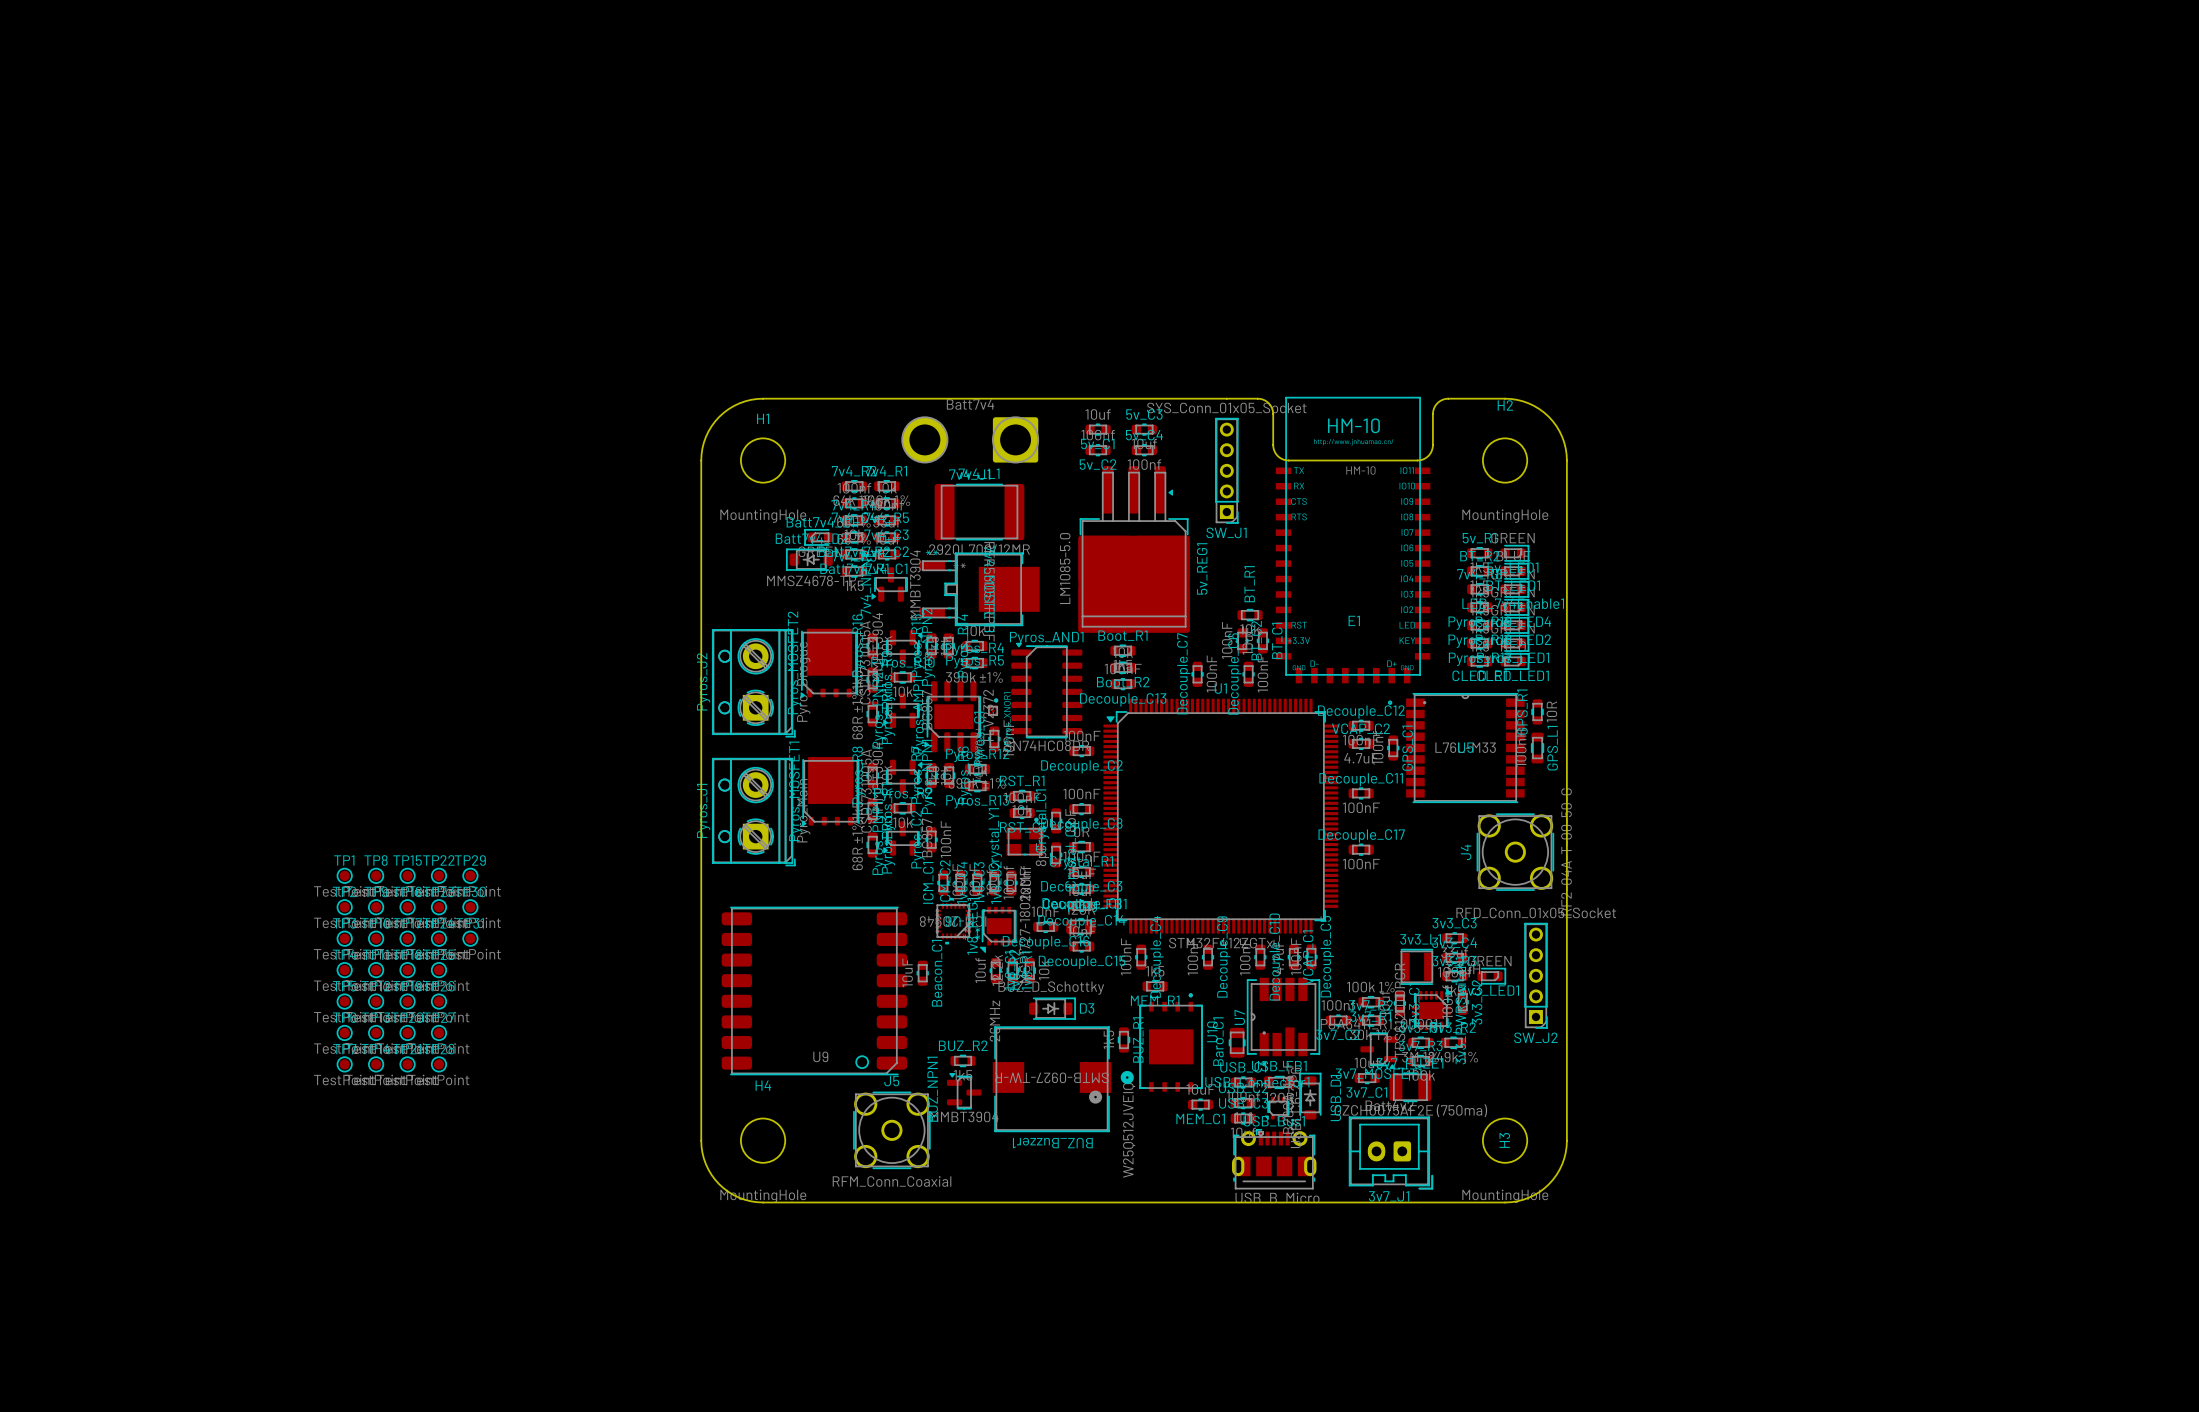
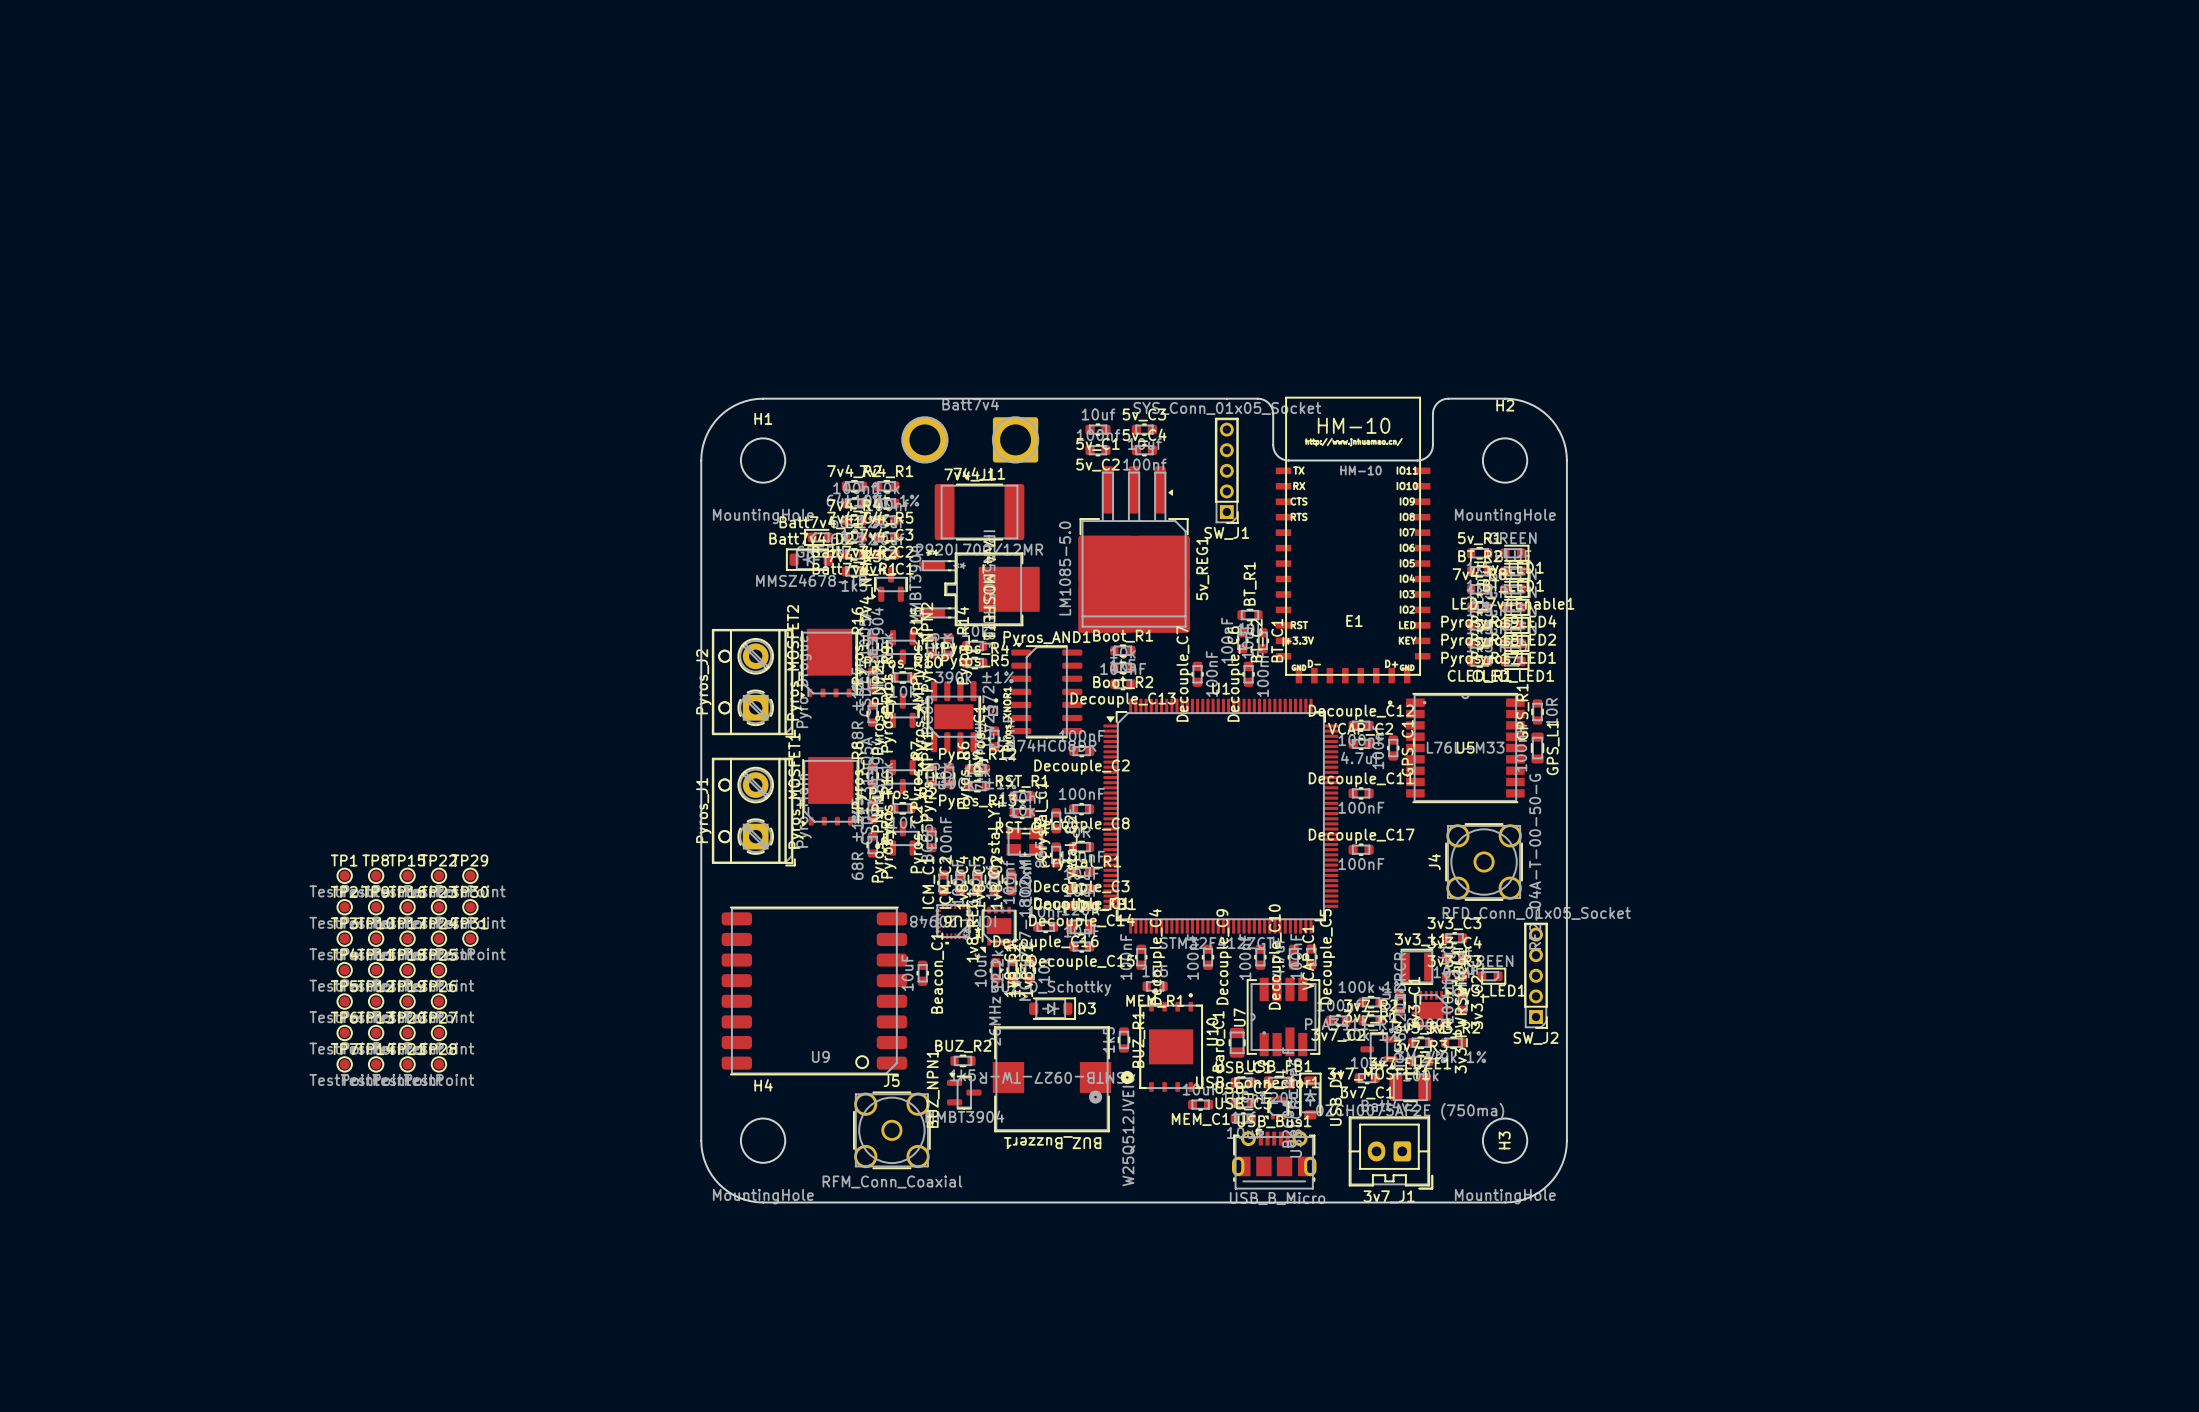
J4 position: (1515, 852) -> (1484, 862)

